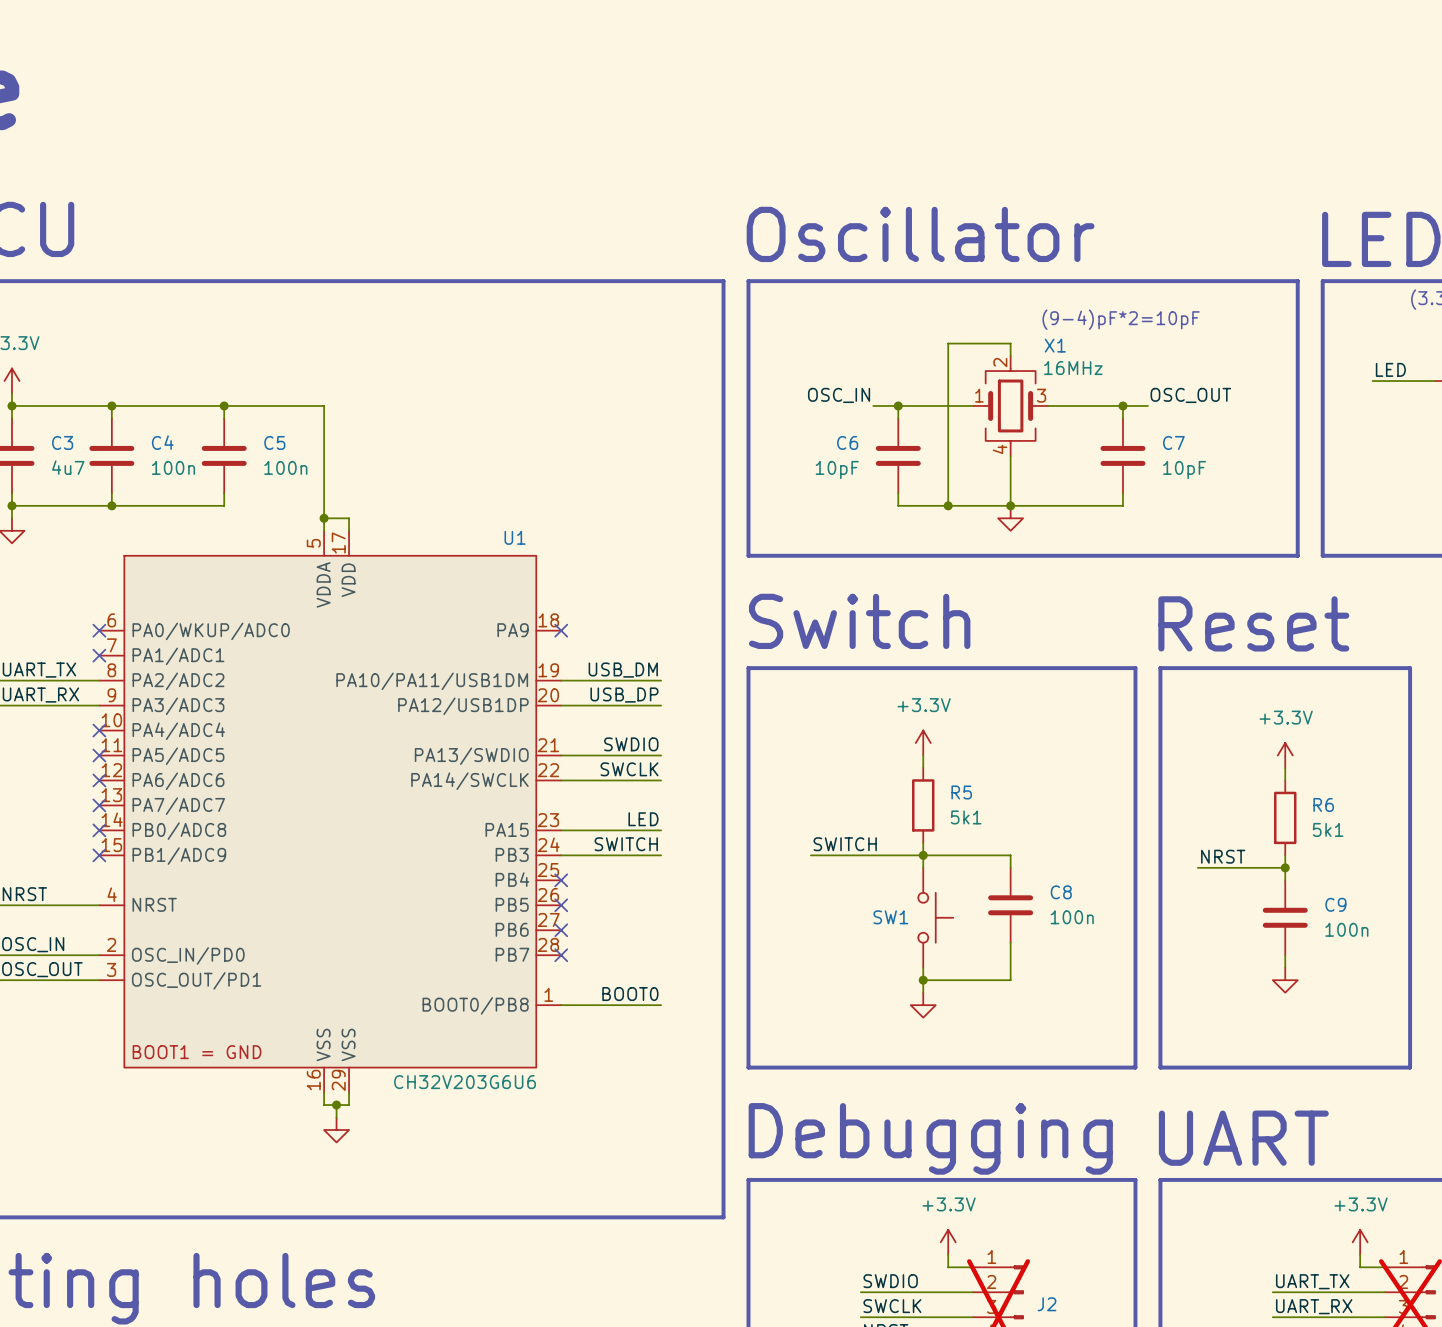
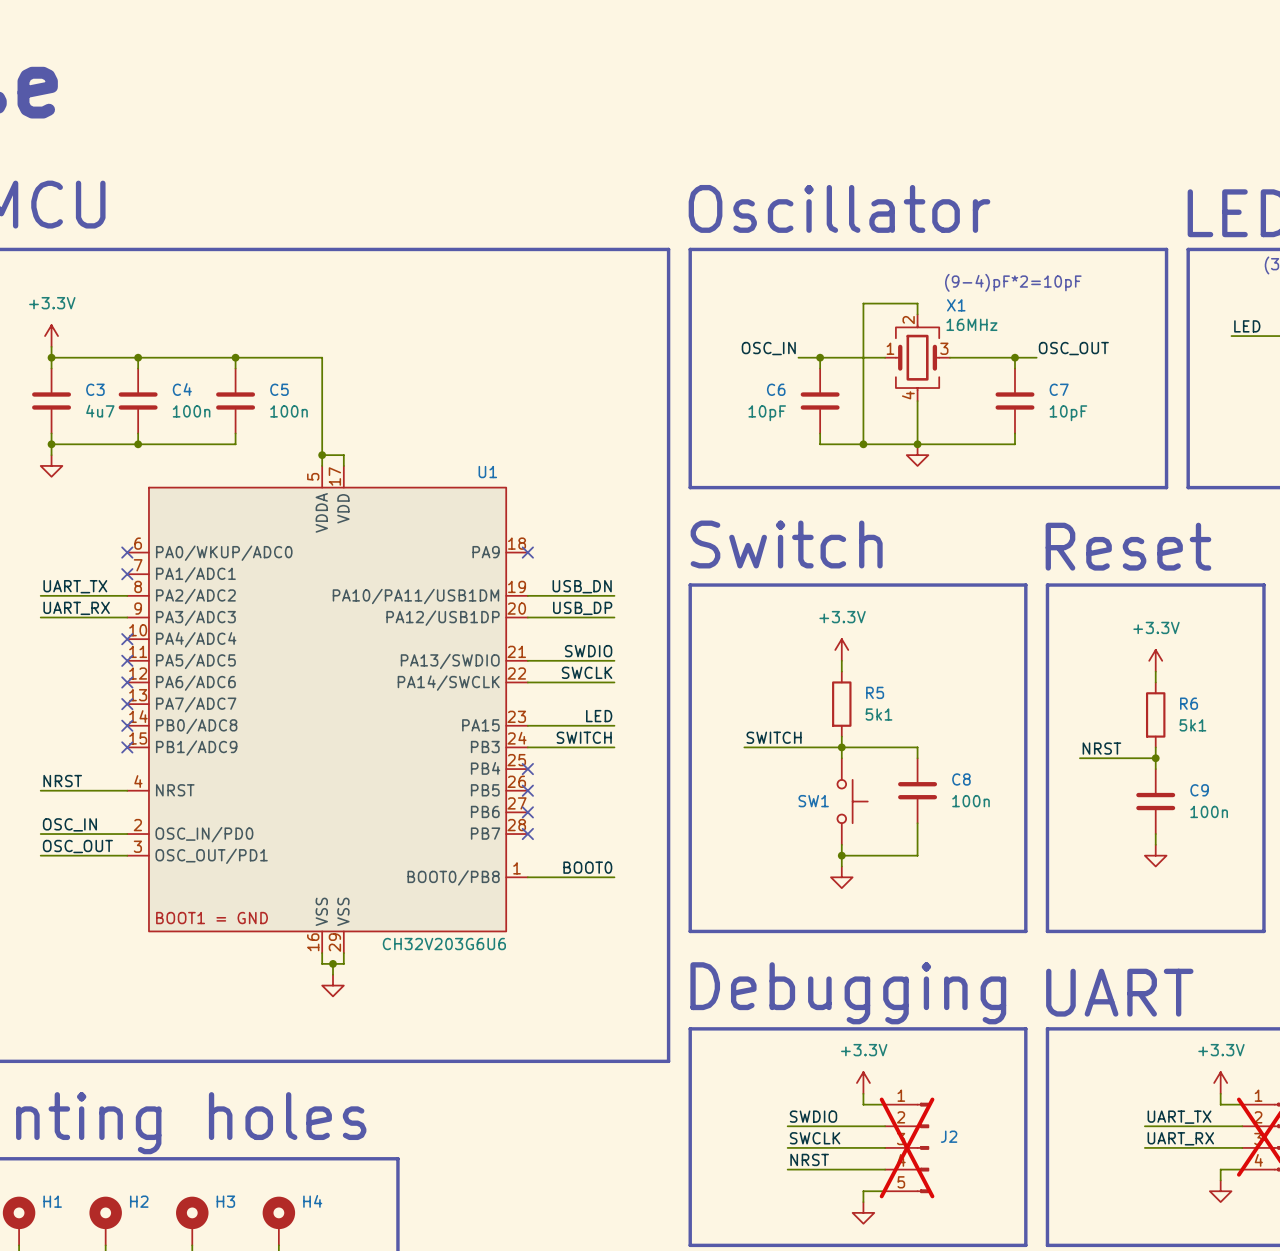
label: USB_DM (623, 670) -> USB_DN (582, 586)

